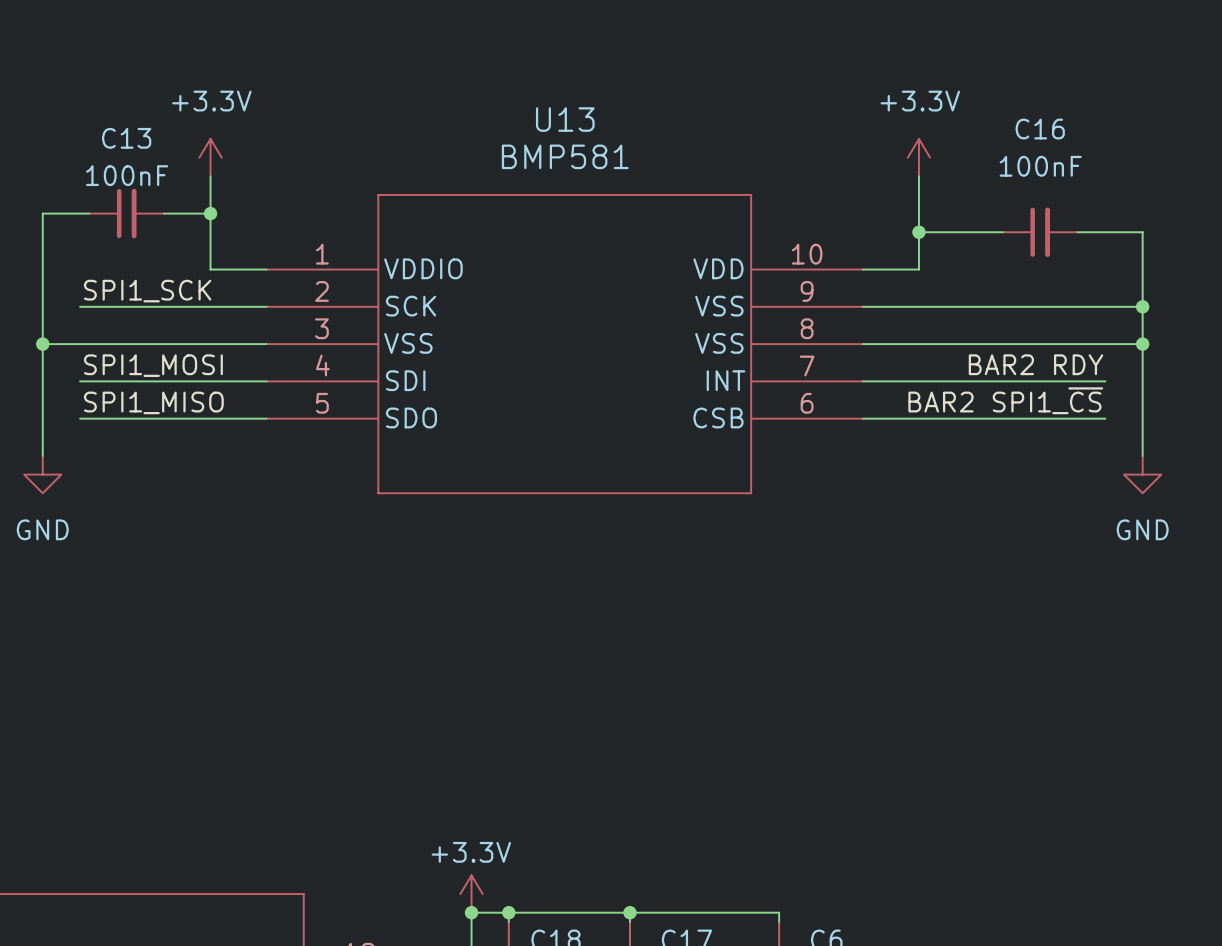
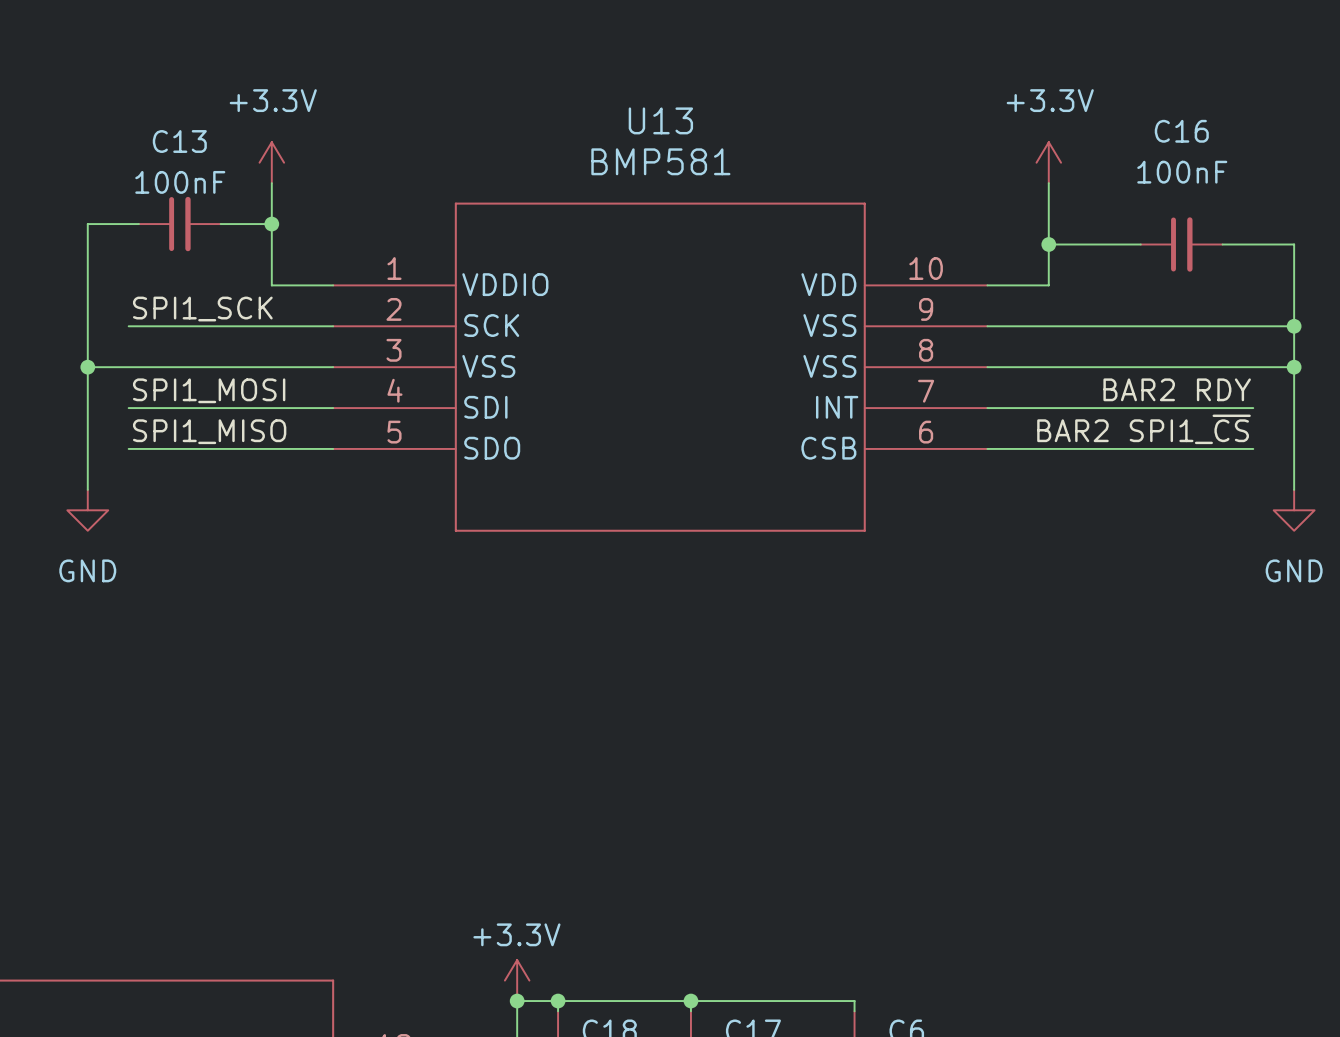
power symbol position: +3.3V (210, 157) -> +3.3V (271, 162)
power symbol position: +3.3V (918, 157) -> +3.3V (1048, 162)
wire: (210, 176) (210, 269) (266, 269) -> (271, 183) (271, 285) (333, 285)
wire: (918, 176) (918, 269) (863, 269) -> (1048, 183) (1048, 285) (987, 285)
wire: (89, 213) (42, 213) (42, 455) -> (138, 224) (87, 224) (87, 489)
C13 position: (126, 213) -> (179, 224)
wire: (163, 213) (210, 213) -> (220, 224) (271, 224)
junction position: (210, 213) -> (271, 224)
wire: (918, 232) (1002, 232) -> (1048, 244) (1140, 244)
junction position: (918, 232) -> (1048, 244)
C16 position: (1040, 232) -> (1181, 244)
wire: (1077, 232) (1142, 232) (1142, 455) -> (1222, 244) (1294, 244) (1294, 489)
label position: SPI1_SCK (147, 291) -> SPI1_SCK (202, 309)
junction: none -> (1294, 326)
wire: (80, 306) (266, 306) -> (128, 326) (333, 326)
wire: (863, 306) (1142, 306) -> (987, 326) (1294, 326)
junction: (1142, 306) -> none
junction: none -> (1294, 367)
wire: (42, 344) (266, 344) -> (87, 367) (333, 367)
junction position: (42, 344) -> (87, 367)
U13 position: (564, 344) -> (660, 367)
wire: (863, 344) (1142, 344) -> (987, 367) (1294, 367)
junction: (1142, 344) -> none
label position: BAR2 RDY (1036, 364) -> BAR2 RDY (1177, 389)
label position: SPI1_MOSI (153, 365) -> SPI1_MOSI (209, 390)
wire: (80, 381) (266, 381) -> (128, 408) (333, 408)
wire: (863, 381) (1105, 381) -> (987, 408) (1253, 408)
label position: BAR2 SPI1_~{CS} (1005, 400) -> BAR2 SPI1_~{CS} (1144, 429)
label position: SPI1_MISO (153, 402) -> SPI1_MISO (209, 431)
wire: (80, 418) (266, 418) -> (128, 448) (333, 448)
wire: (863, 418) (1105, 418) -> (987, 448) (1253, 448)
power symbol position: GND (42, 474) -> GND (87, 510)
power symbol position: GND (1142, 474) -> GND (1294, 510)

